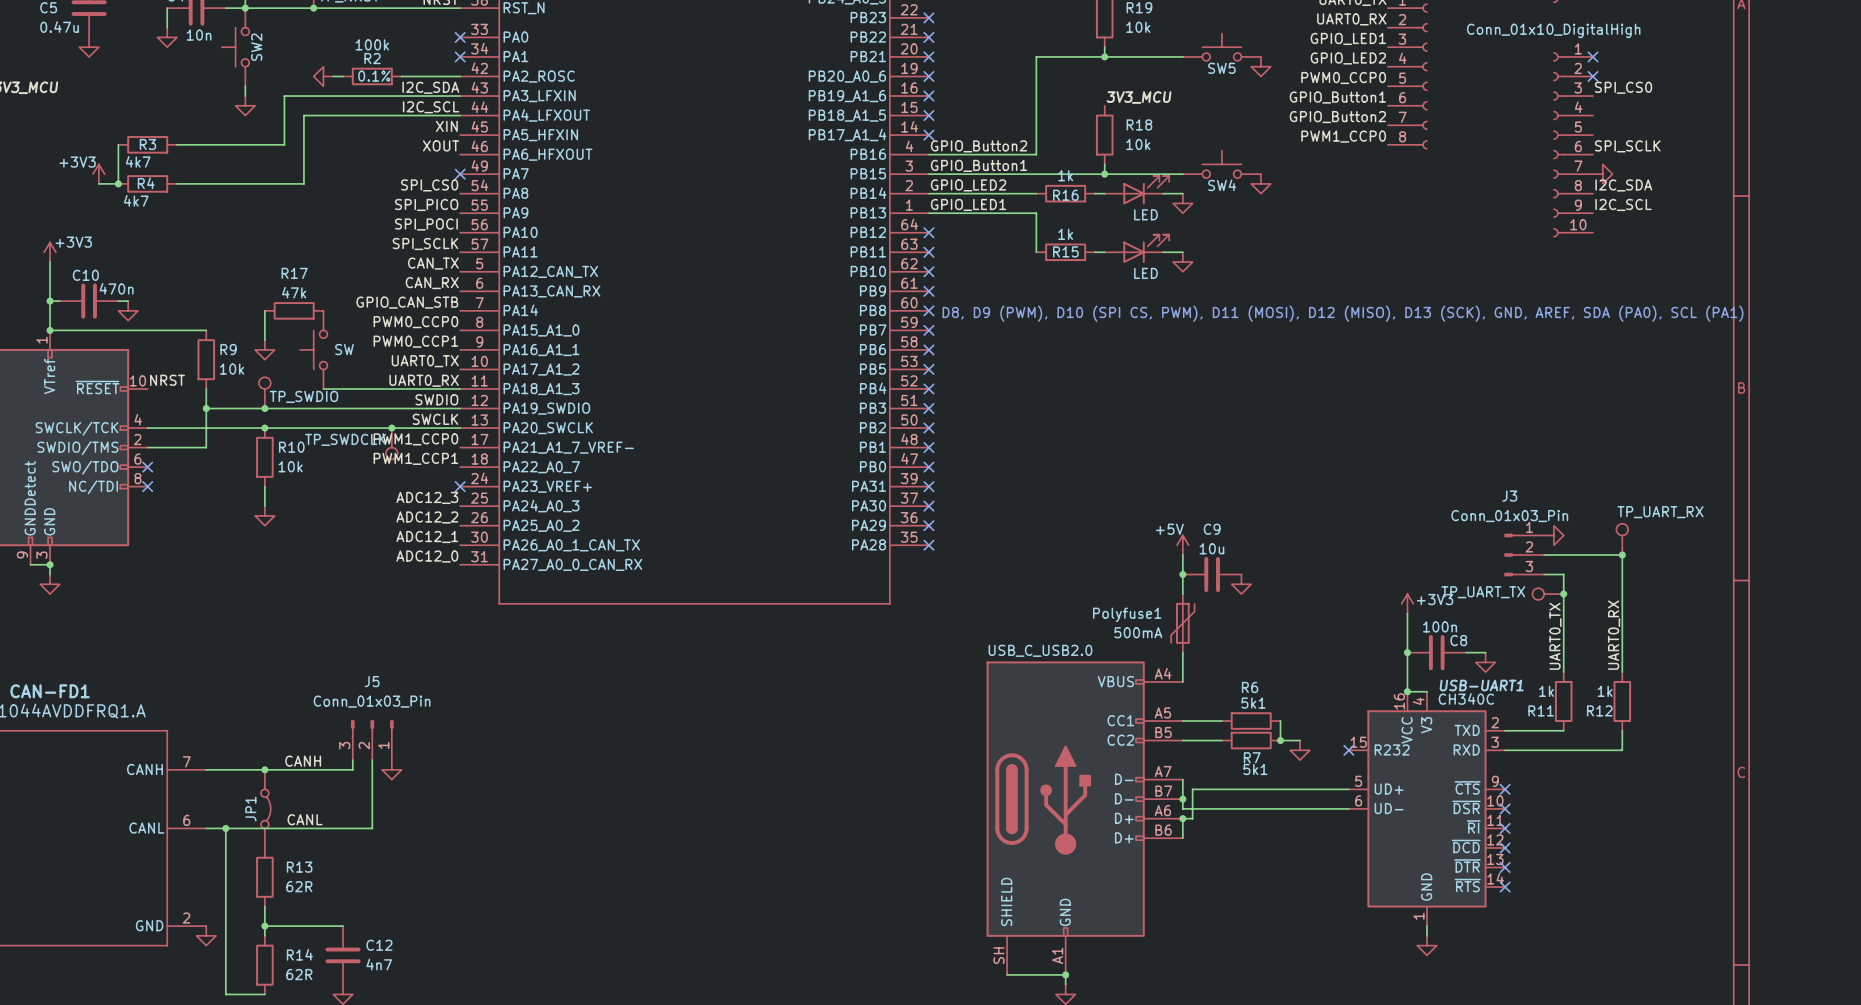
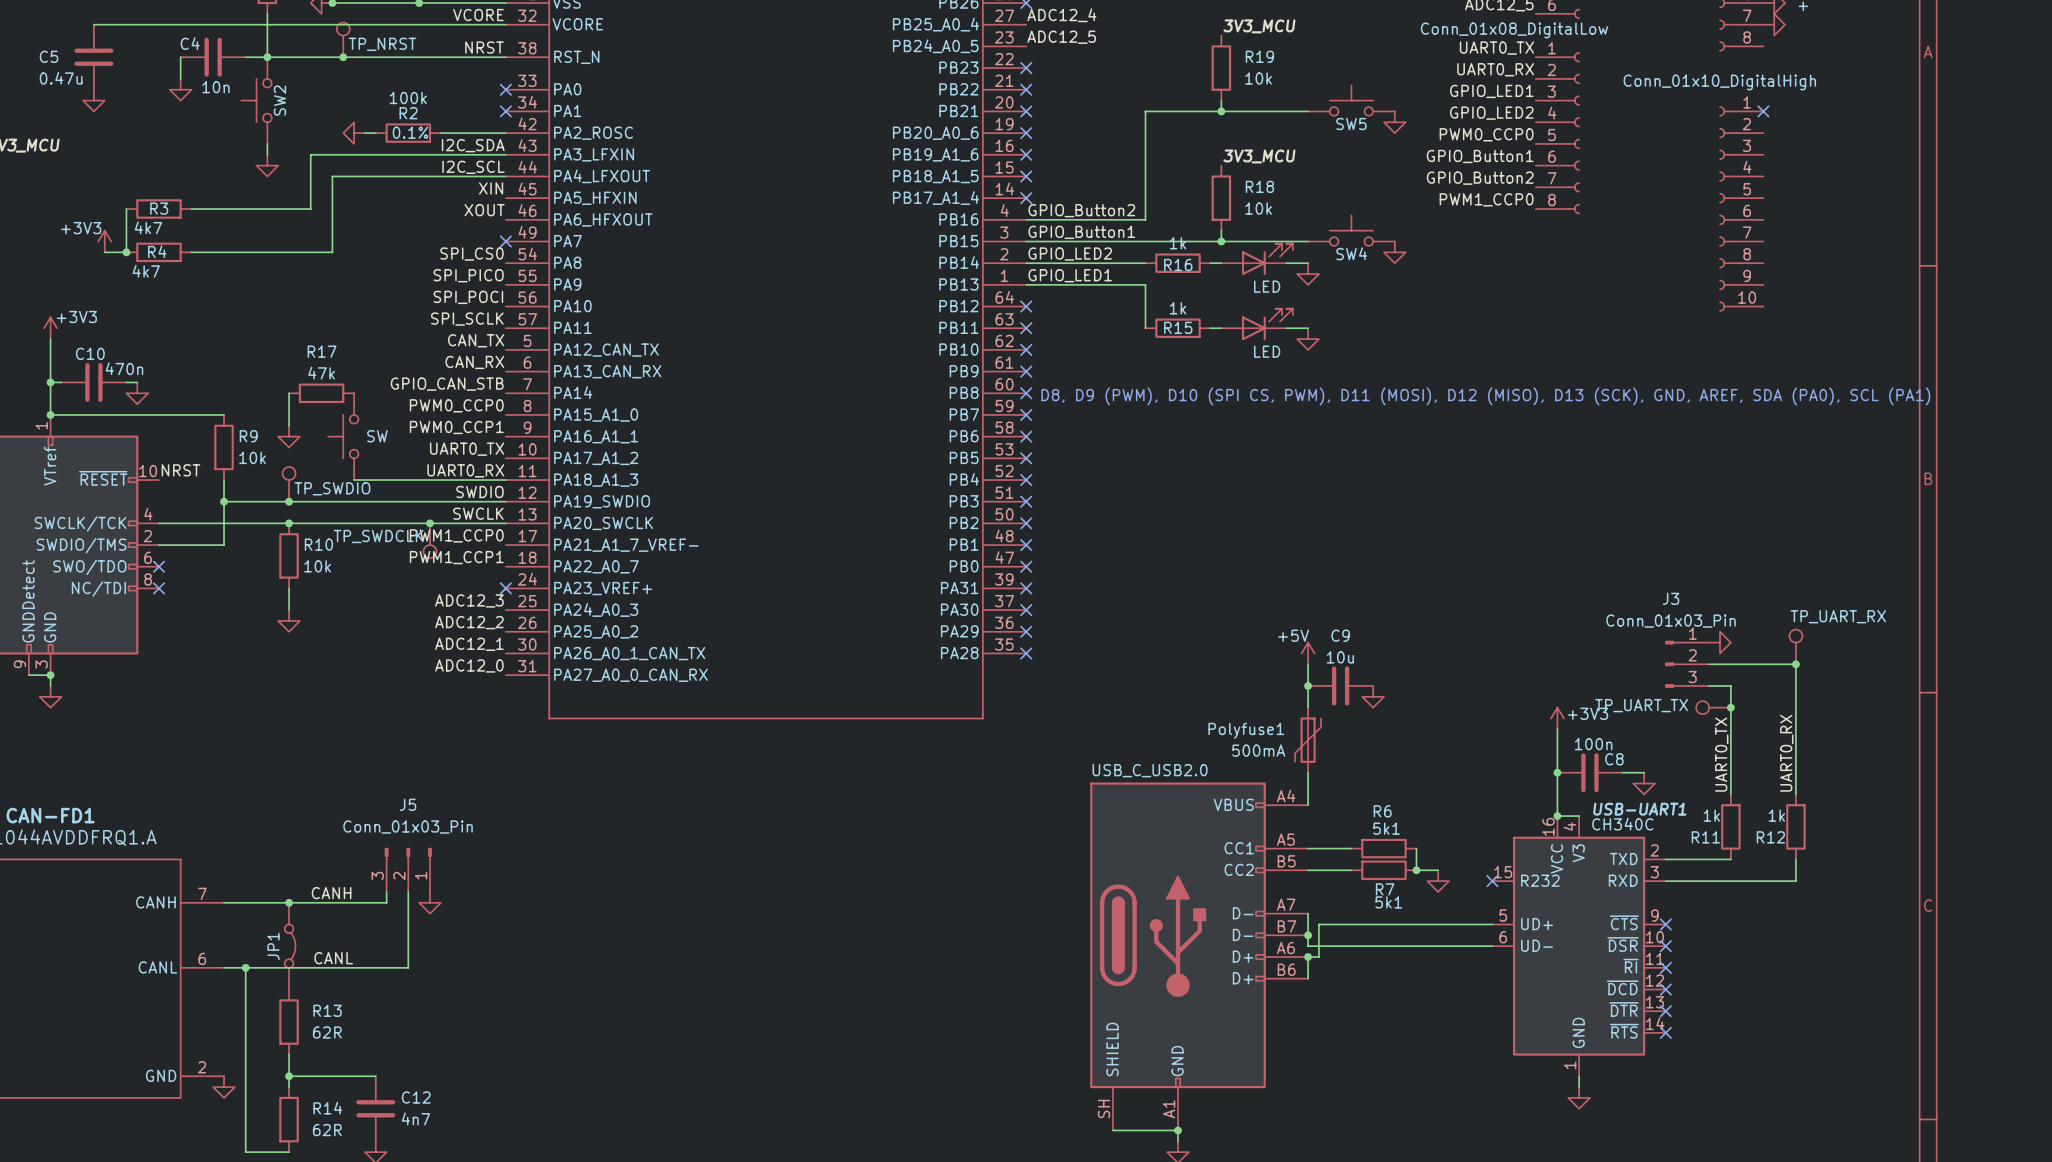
no-connect mark: (1593, 76) -> none
label: SPI_CS0 (1623, 87) -> none
label: SPI_SCLK (1627, 146) -> none
power symbol: (1602, 174) -> none
label: I2C_SDA (1623, 185) -> none
label: I2C_SCL (1623, 204) -> none

